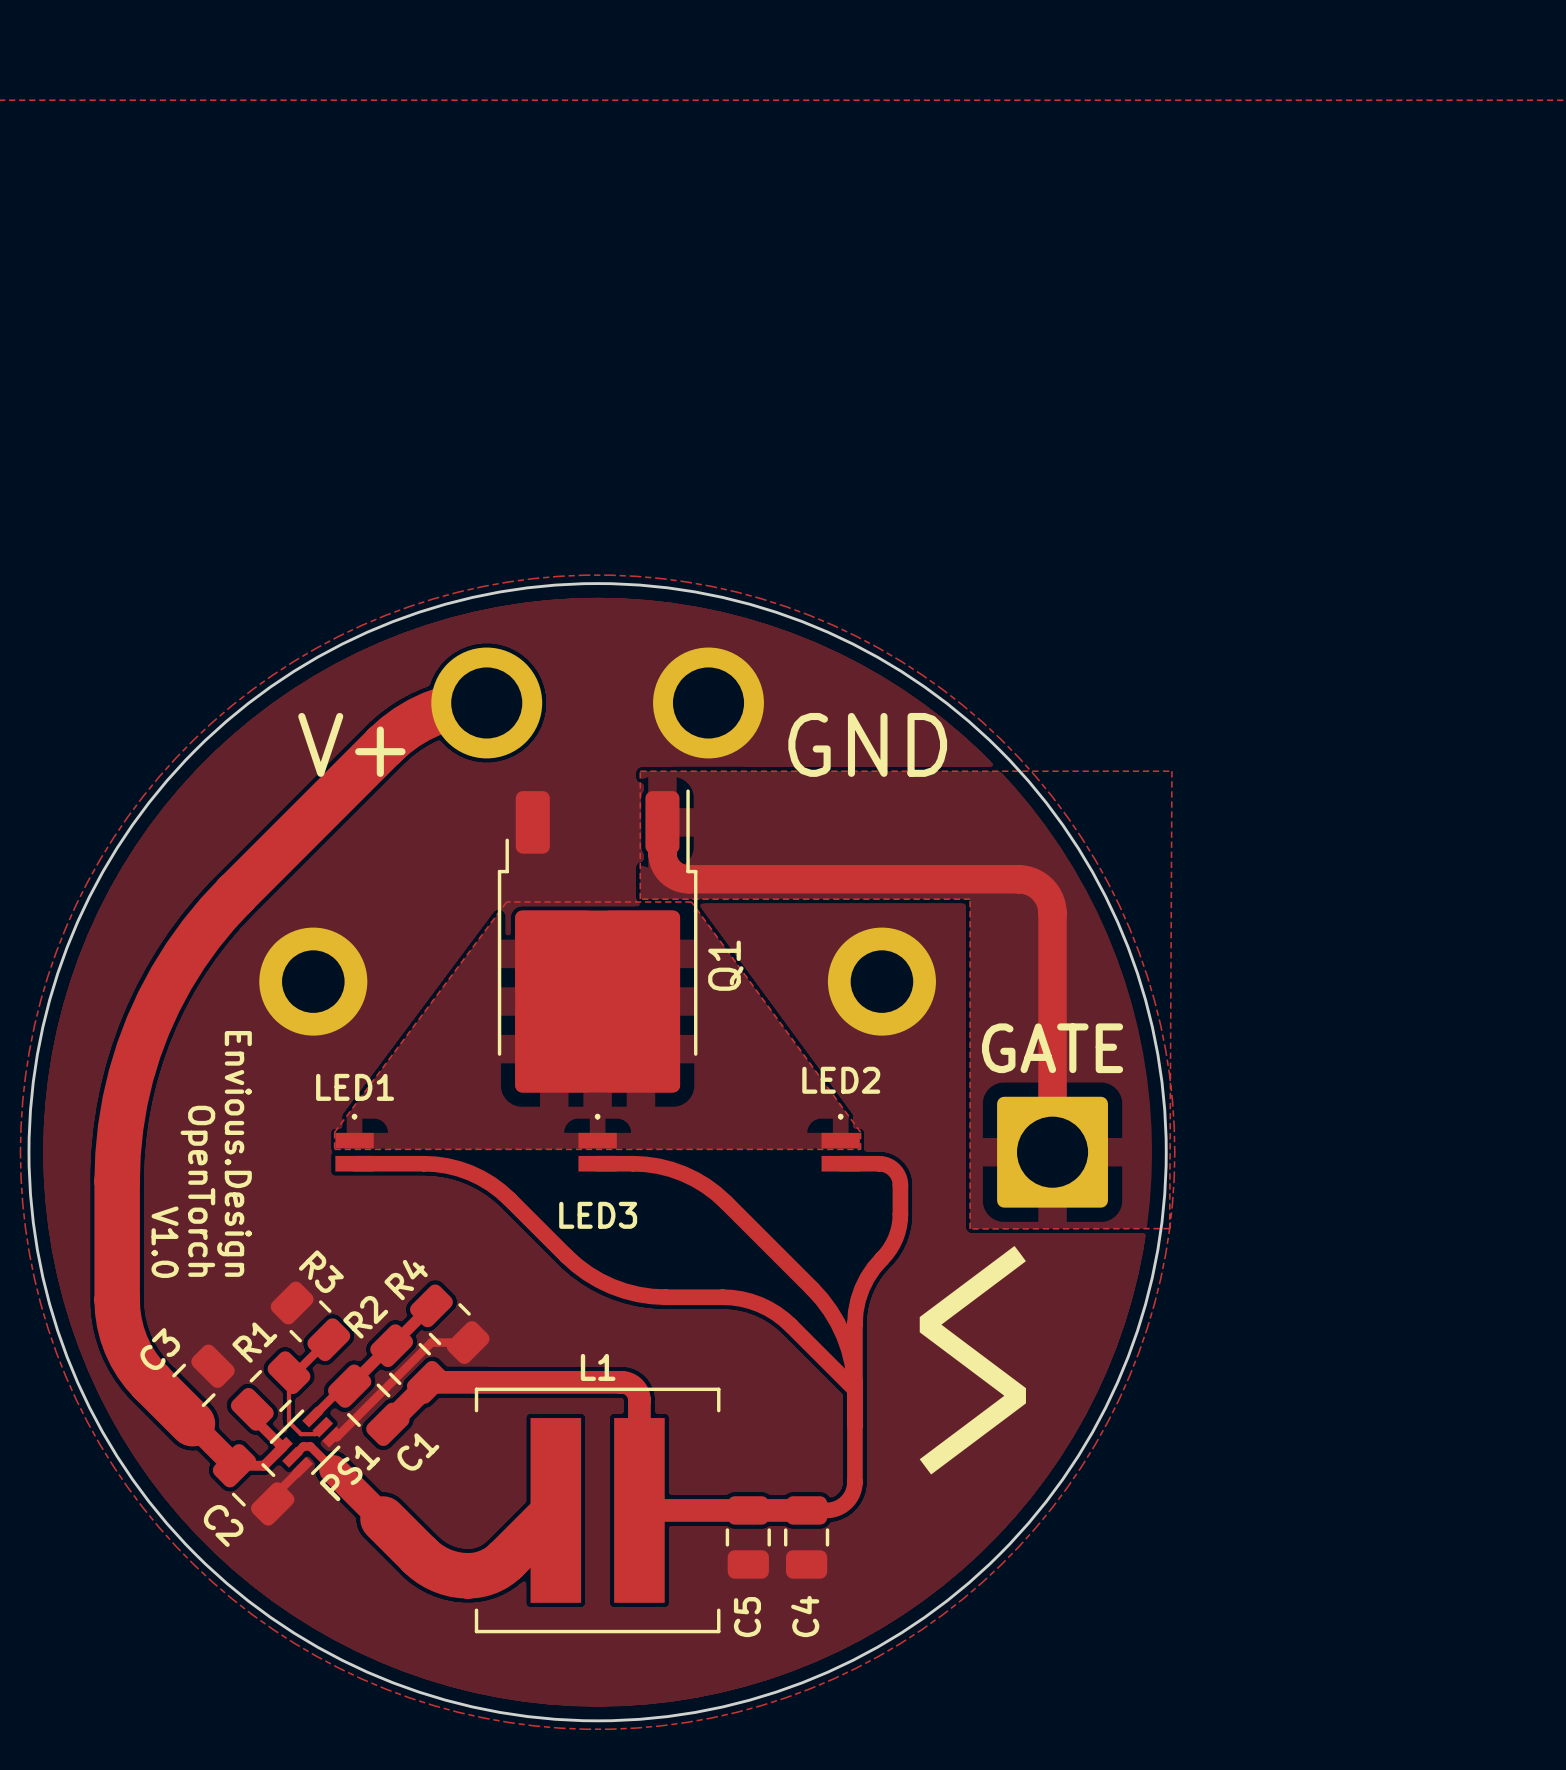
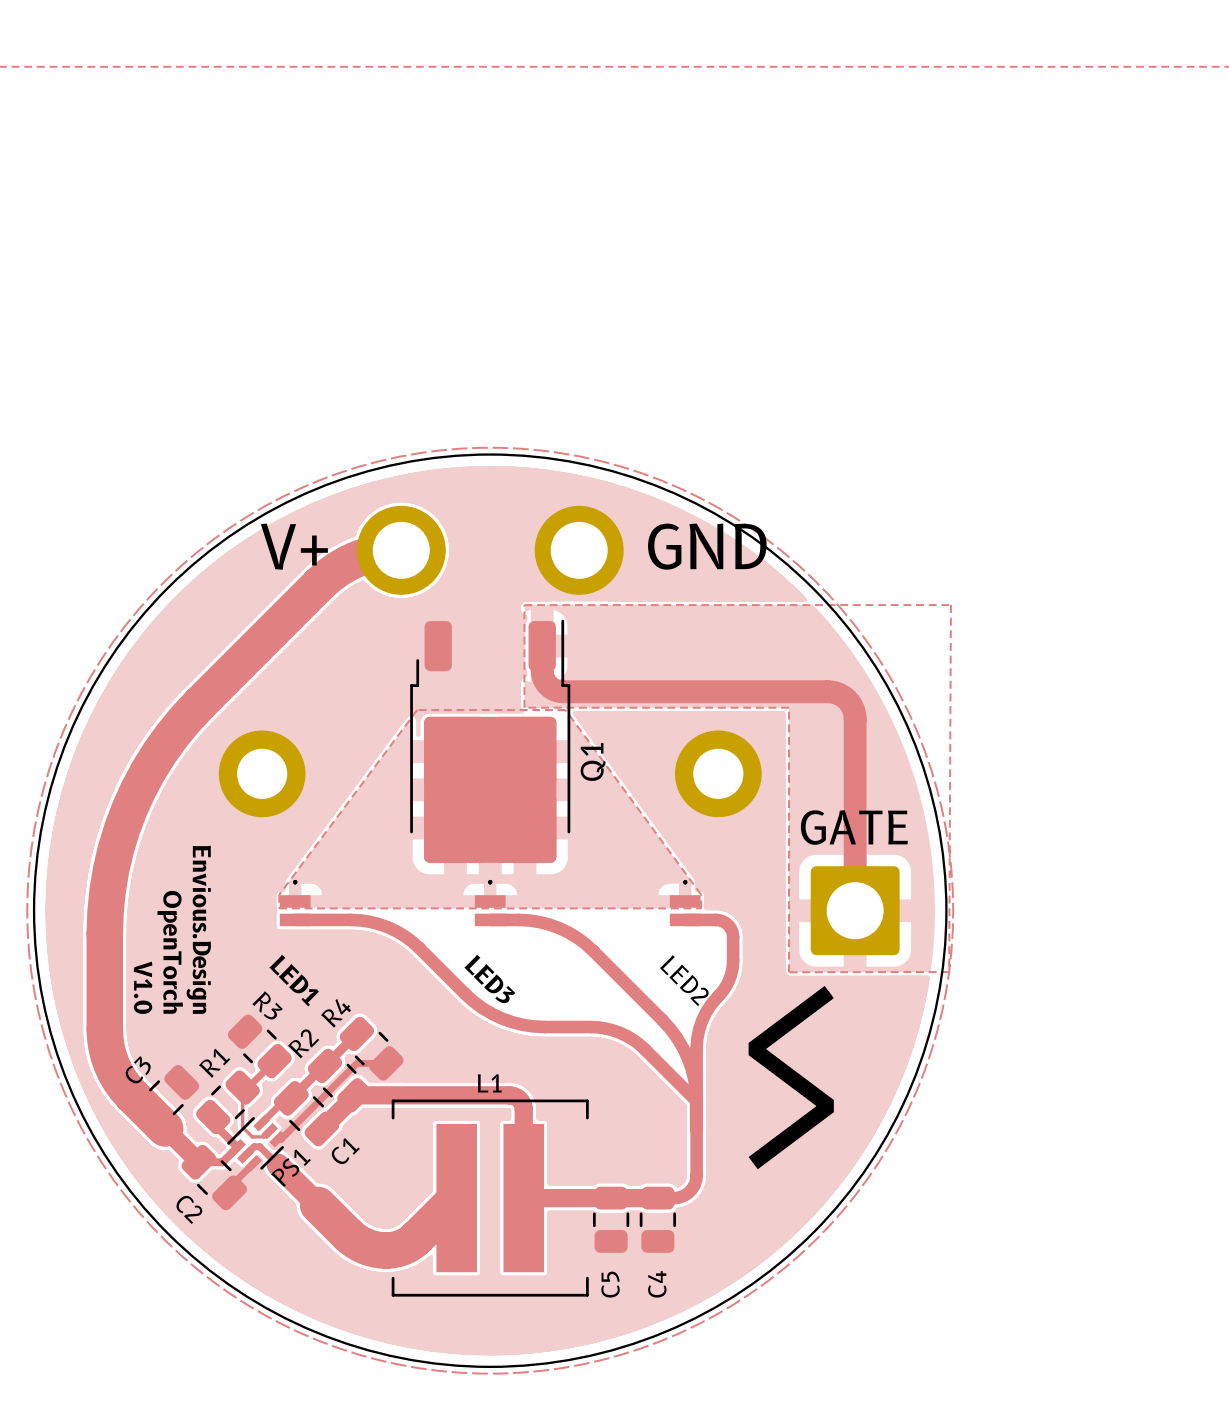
text position: V+ (351, 744) -> V+ (294, 546)
text position: GND (867, 744) -> GND (707, 546)
LED2 name rotation: 0° (841, 1080) -> 45° clockwise (684, 980)
LED2 name position: LED2 (841, 1080) -> LED2 (684, 980)
LED1 name rotation: 0° (355, 1087) -> 45° clockwise (294, 980)
LED1 name position: LED1 (355, 1087) -> LED1 (294, 980)
LED3 name rotation: 0° (598, 1215) -> 45° clockwise (489, 978)

